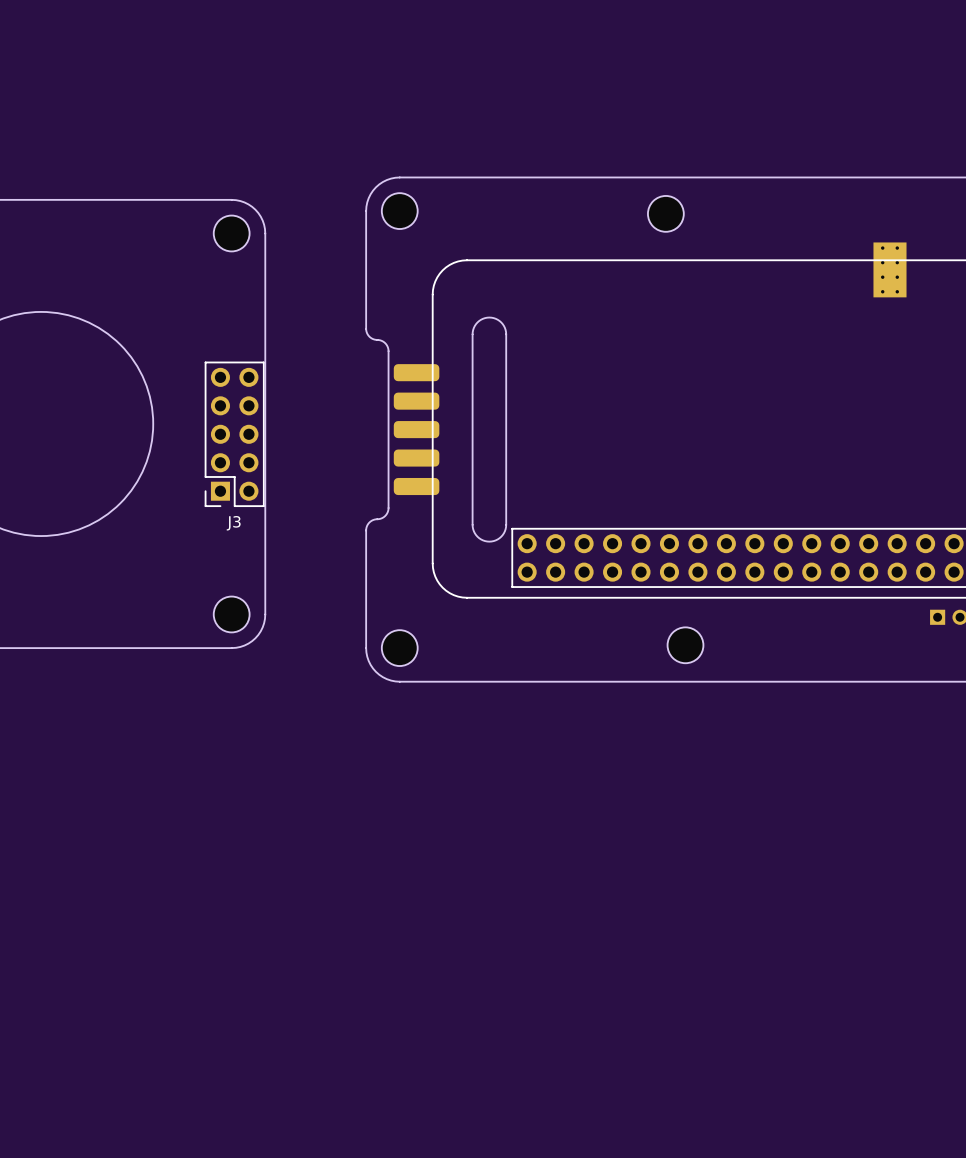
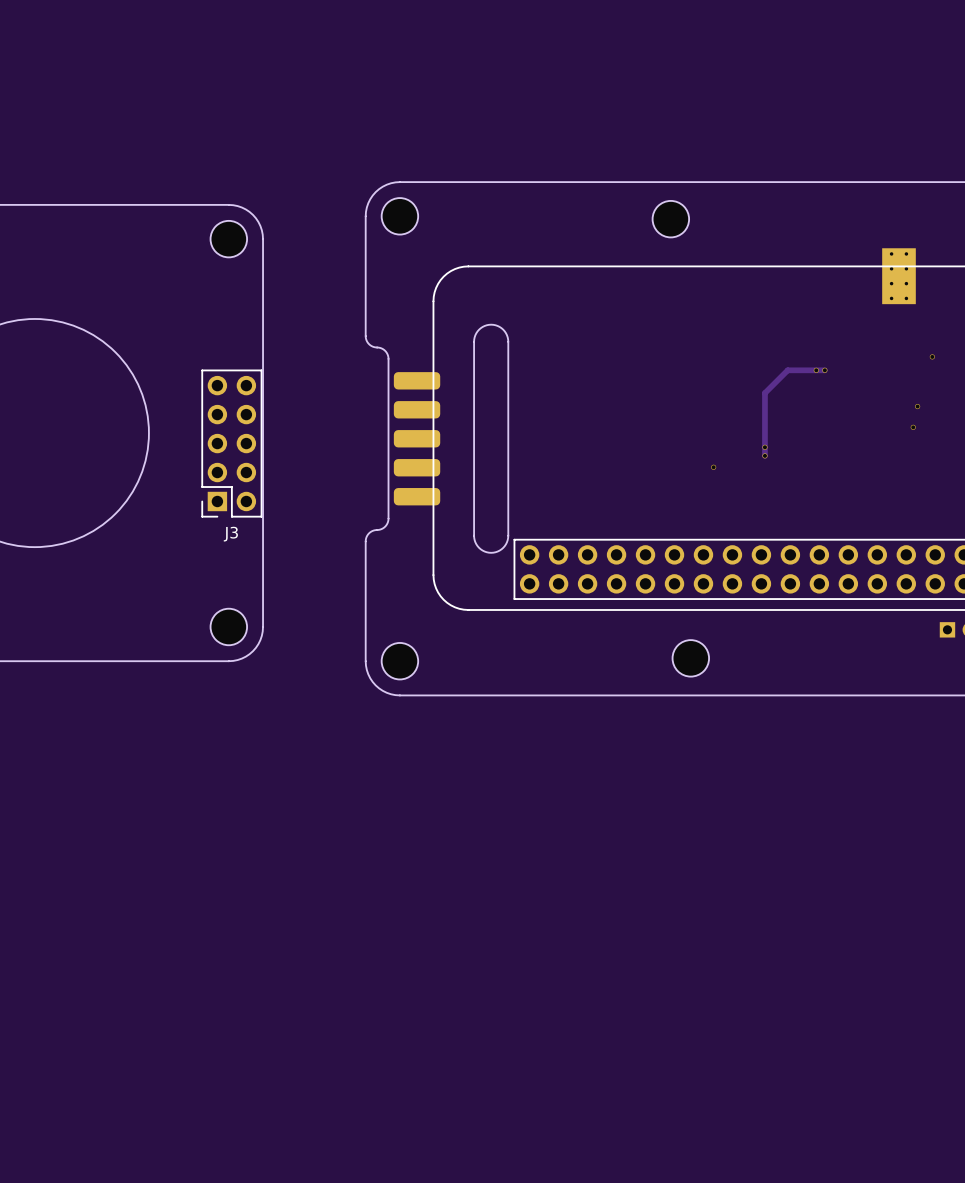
via: none -> (932, 356)
via: none -> (816, 370)
track: none -> (824, 370) (787, 370) (764, 393) (764, 455)
via: none -> (824, 370)
via: none -> (917, 406)
via: none -> (913, 427)
via: none -> (764, 447)
via: none -> (764, 455)
via: none -> (713, 467)

